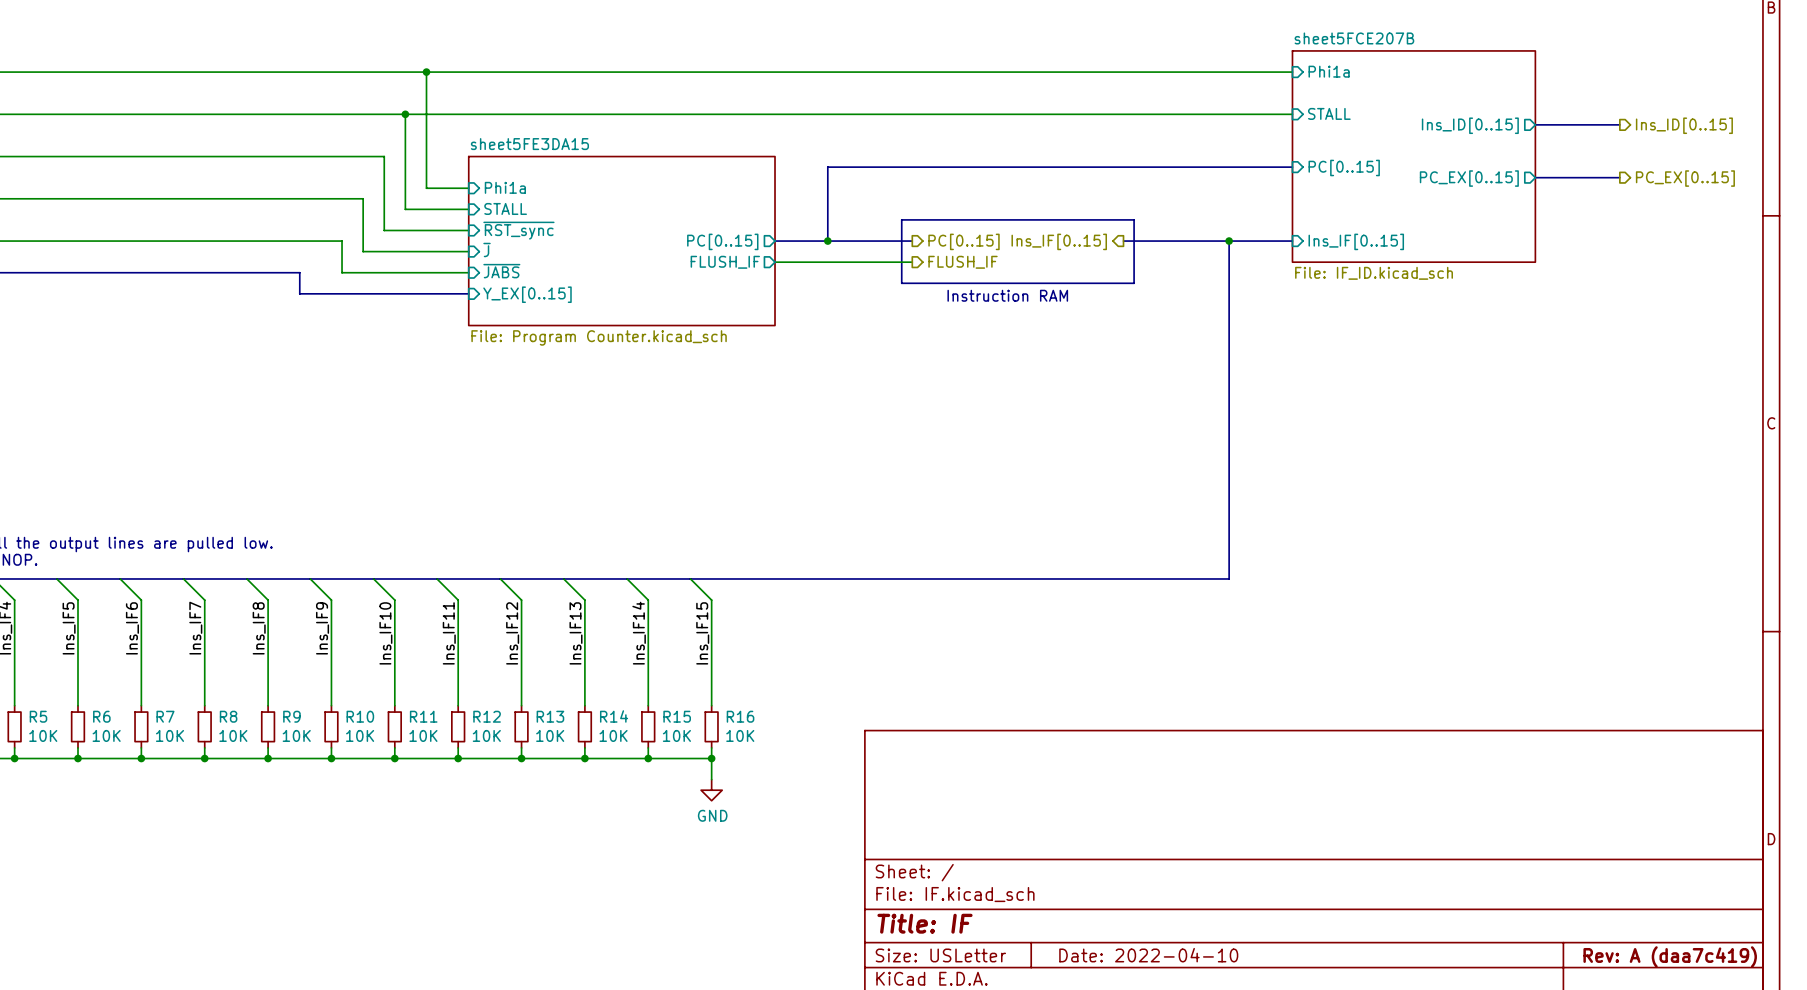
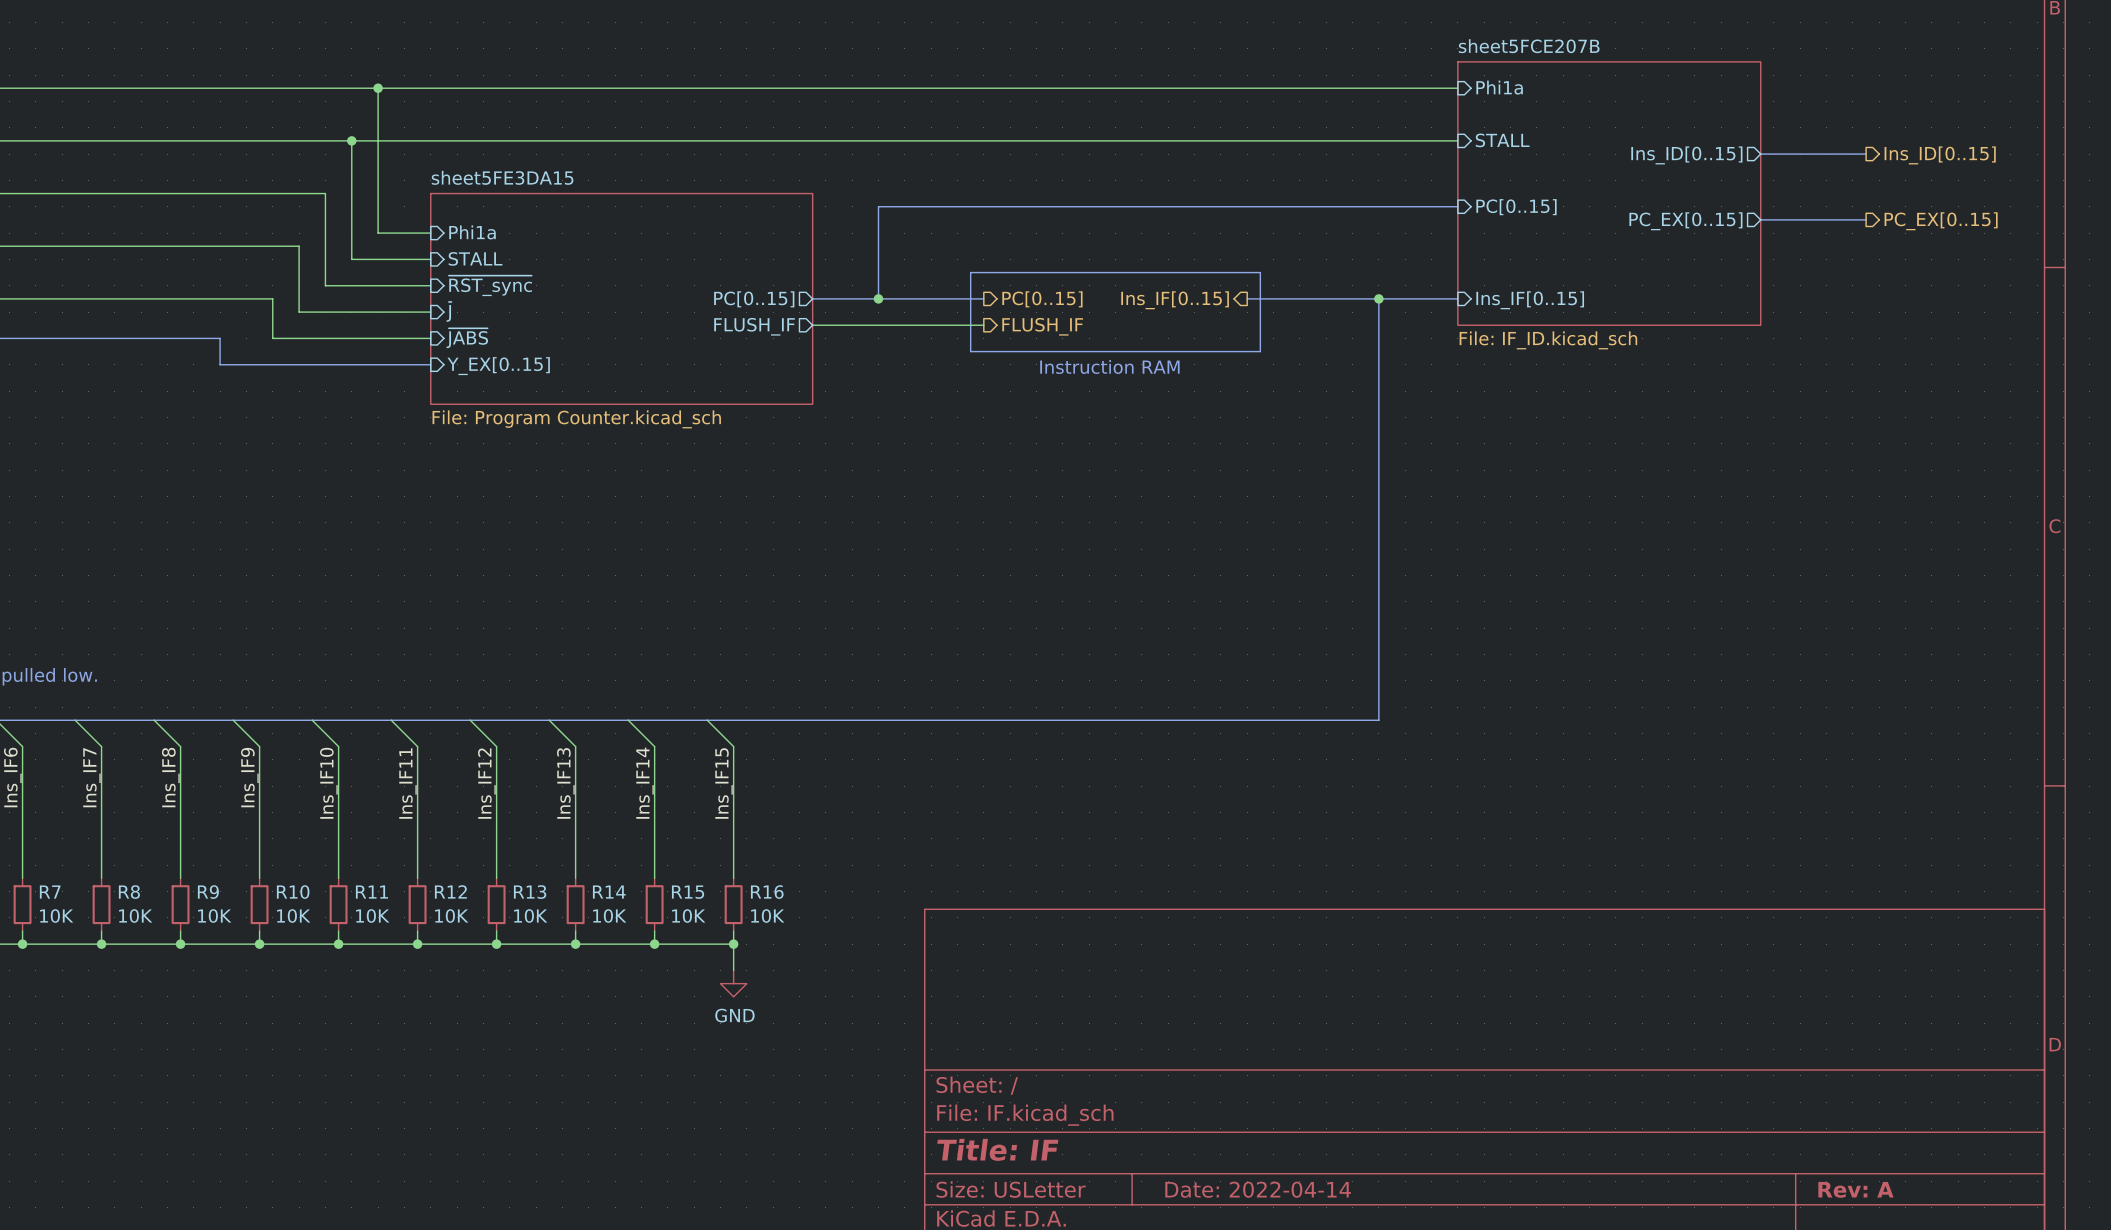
title block: Date: 2022-04-10 (1148, 955) -> Date: 2022-04-14 (1258, 1189)
title block: Rev: A (daa7c419) (1670, 956) -> Rev: A (1855, 1189)

